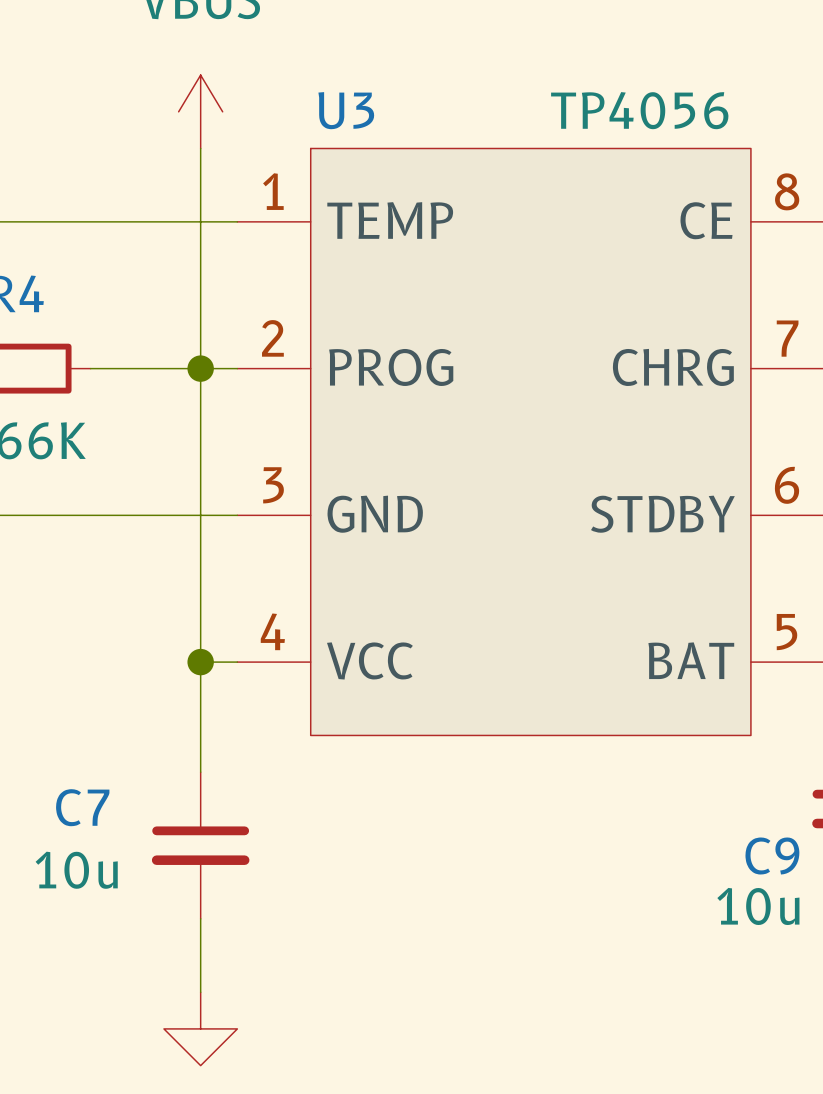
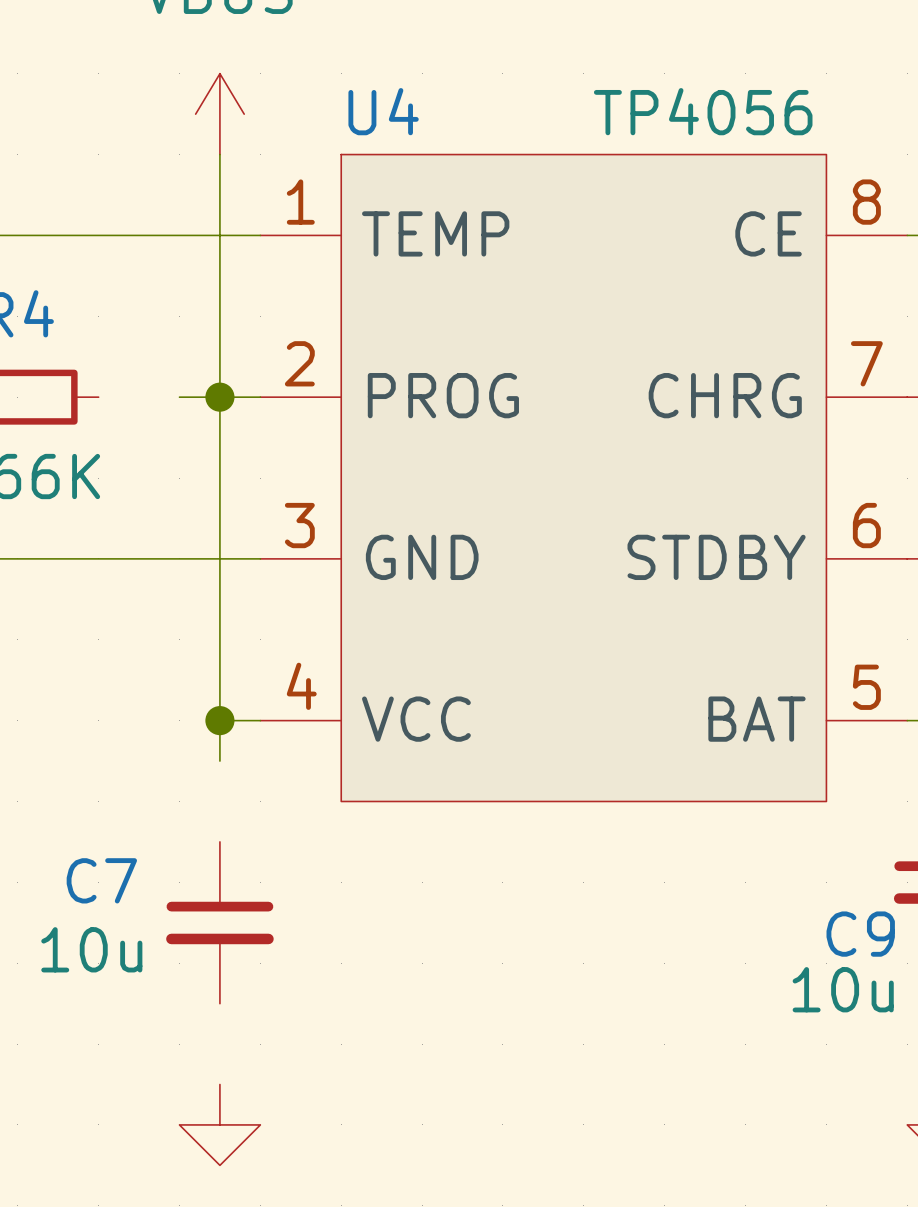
U3 name: U3 (346, 110) -> U4 (383, 111)
wire: (90, 368) (163, 368) -> none
wire: (200, 698) (200, 772) -> none
wire: (200, 918) (200, 992) -> none

